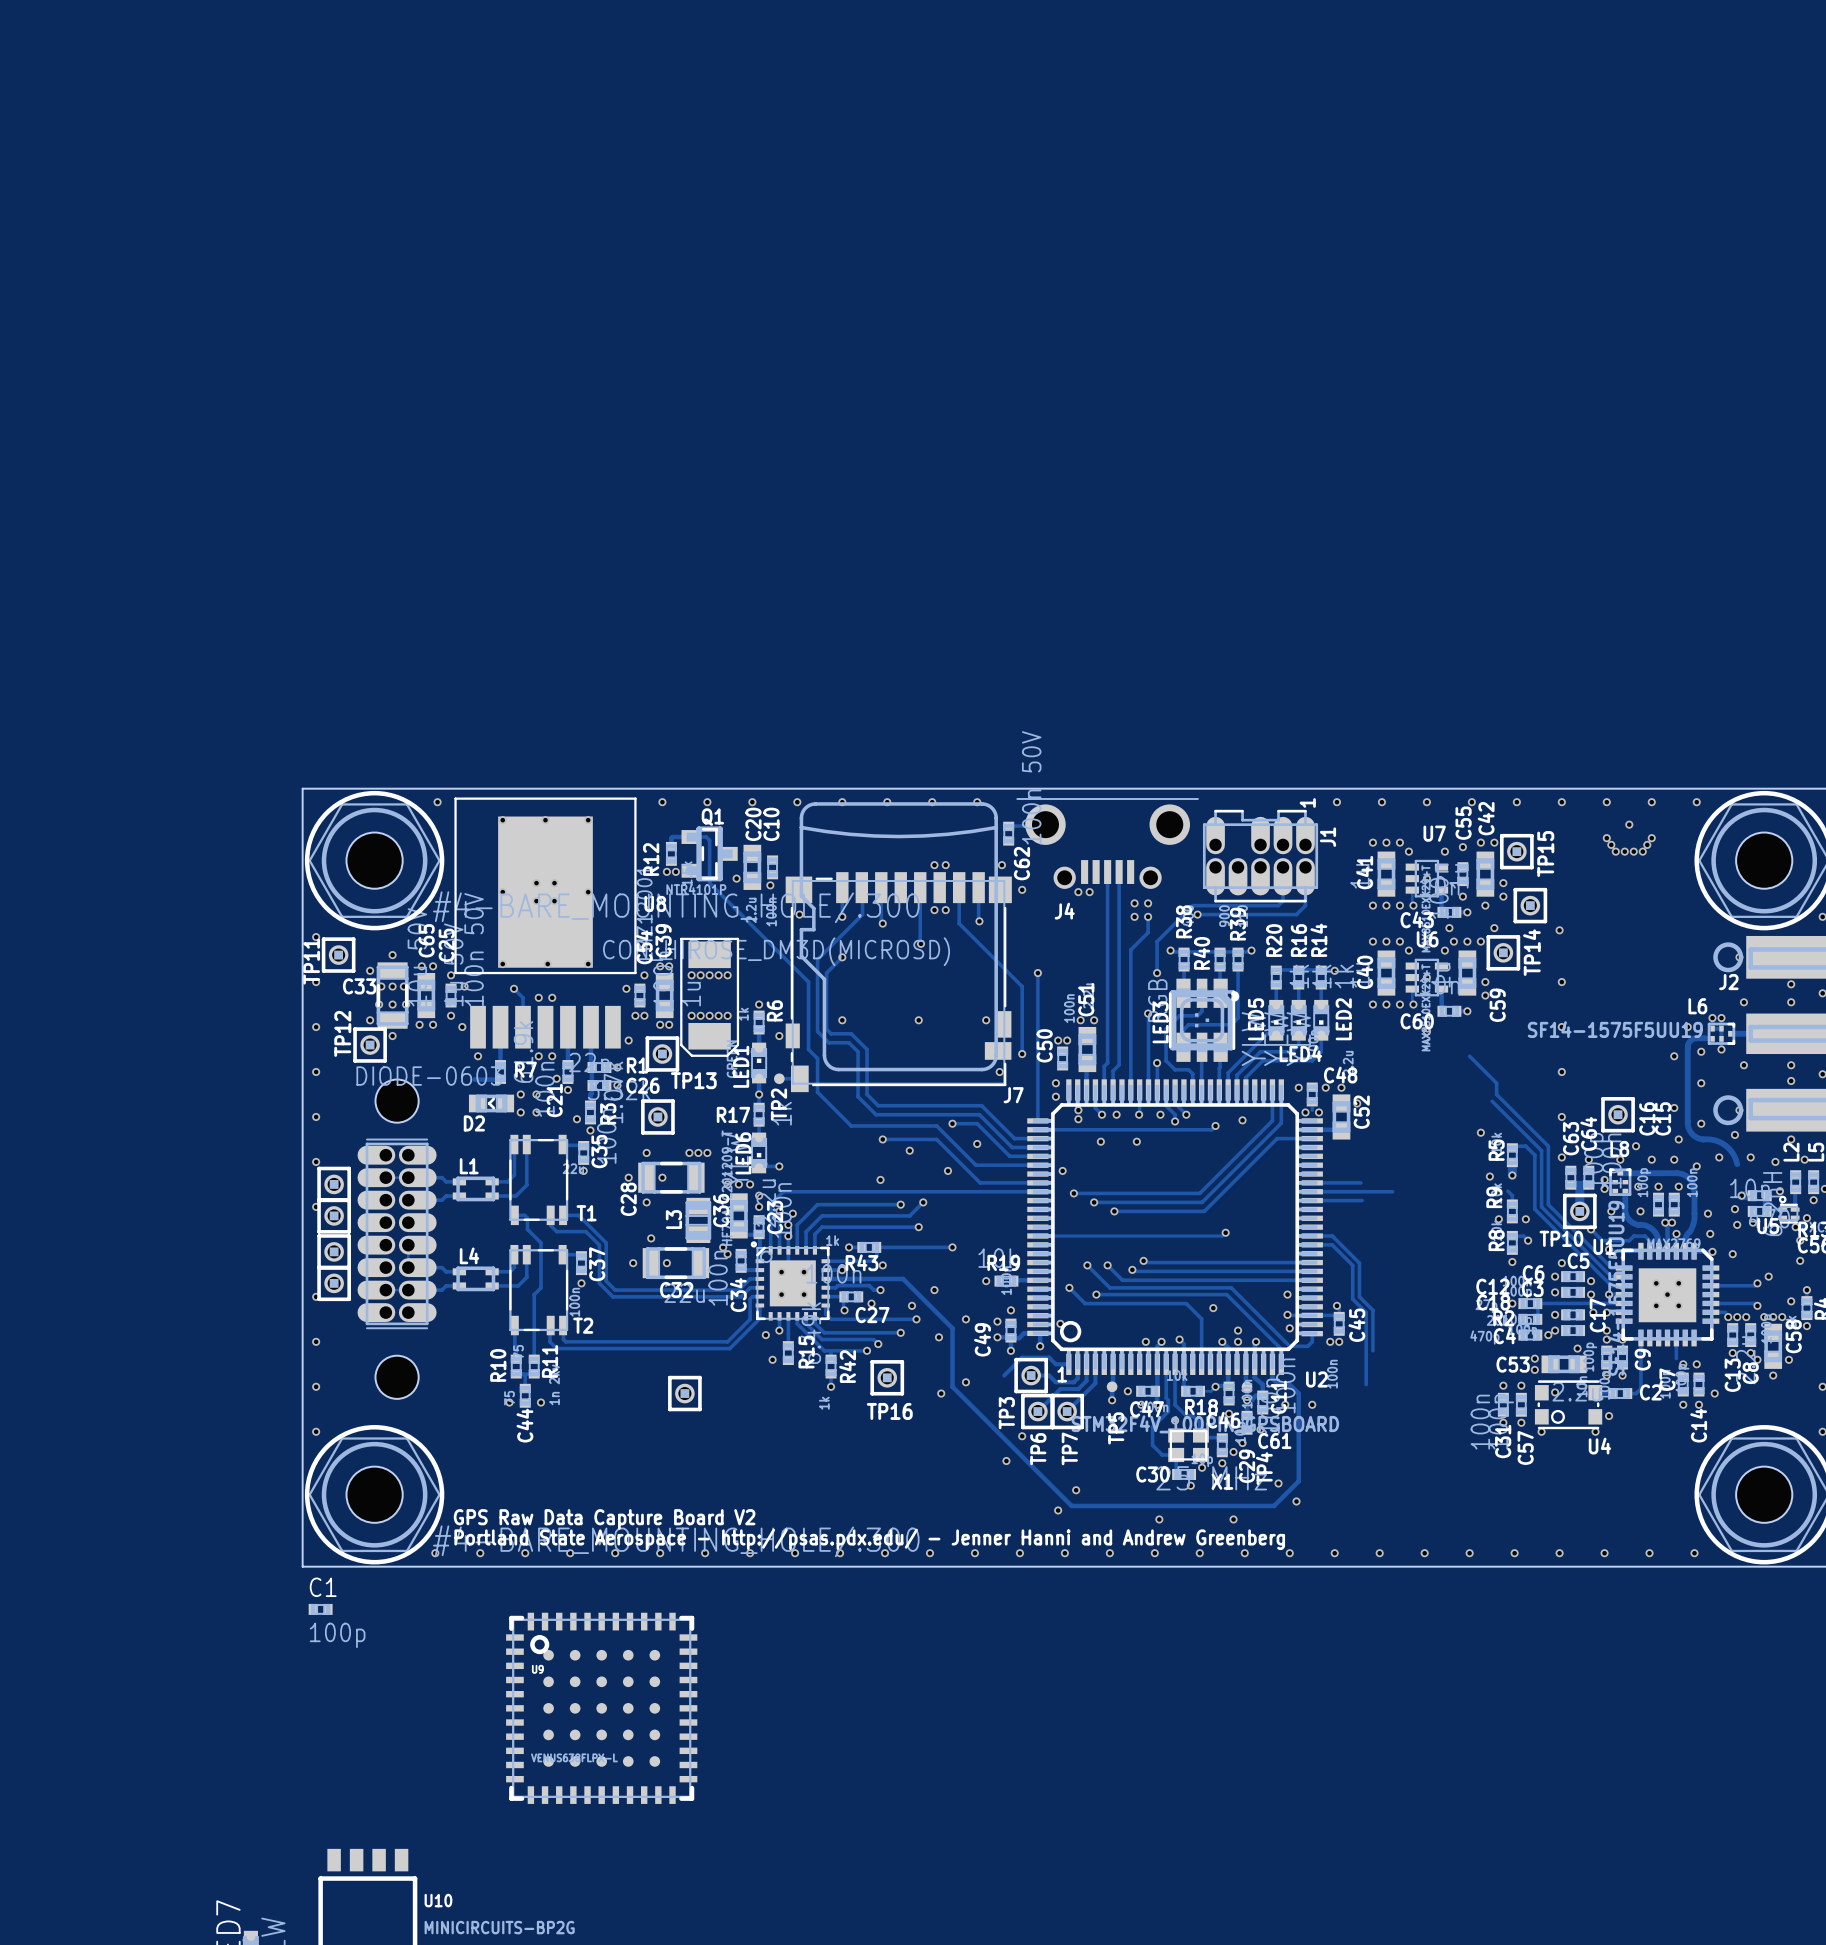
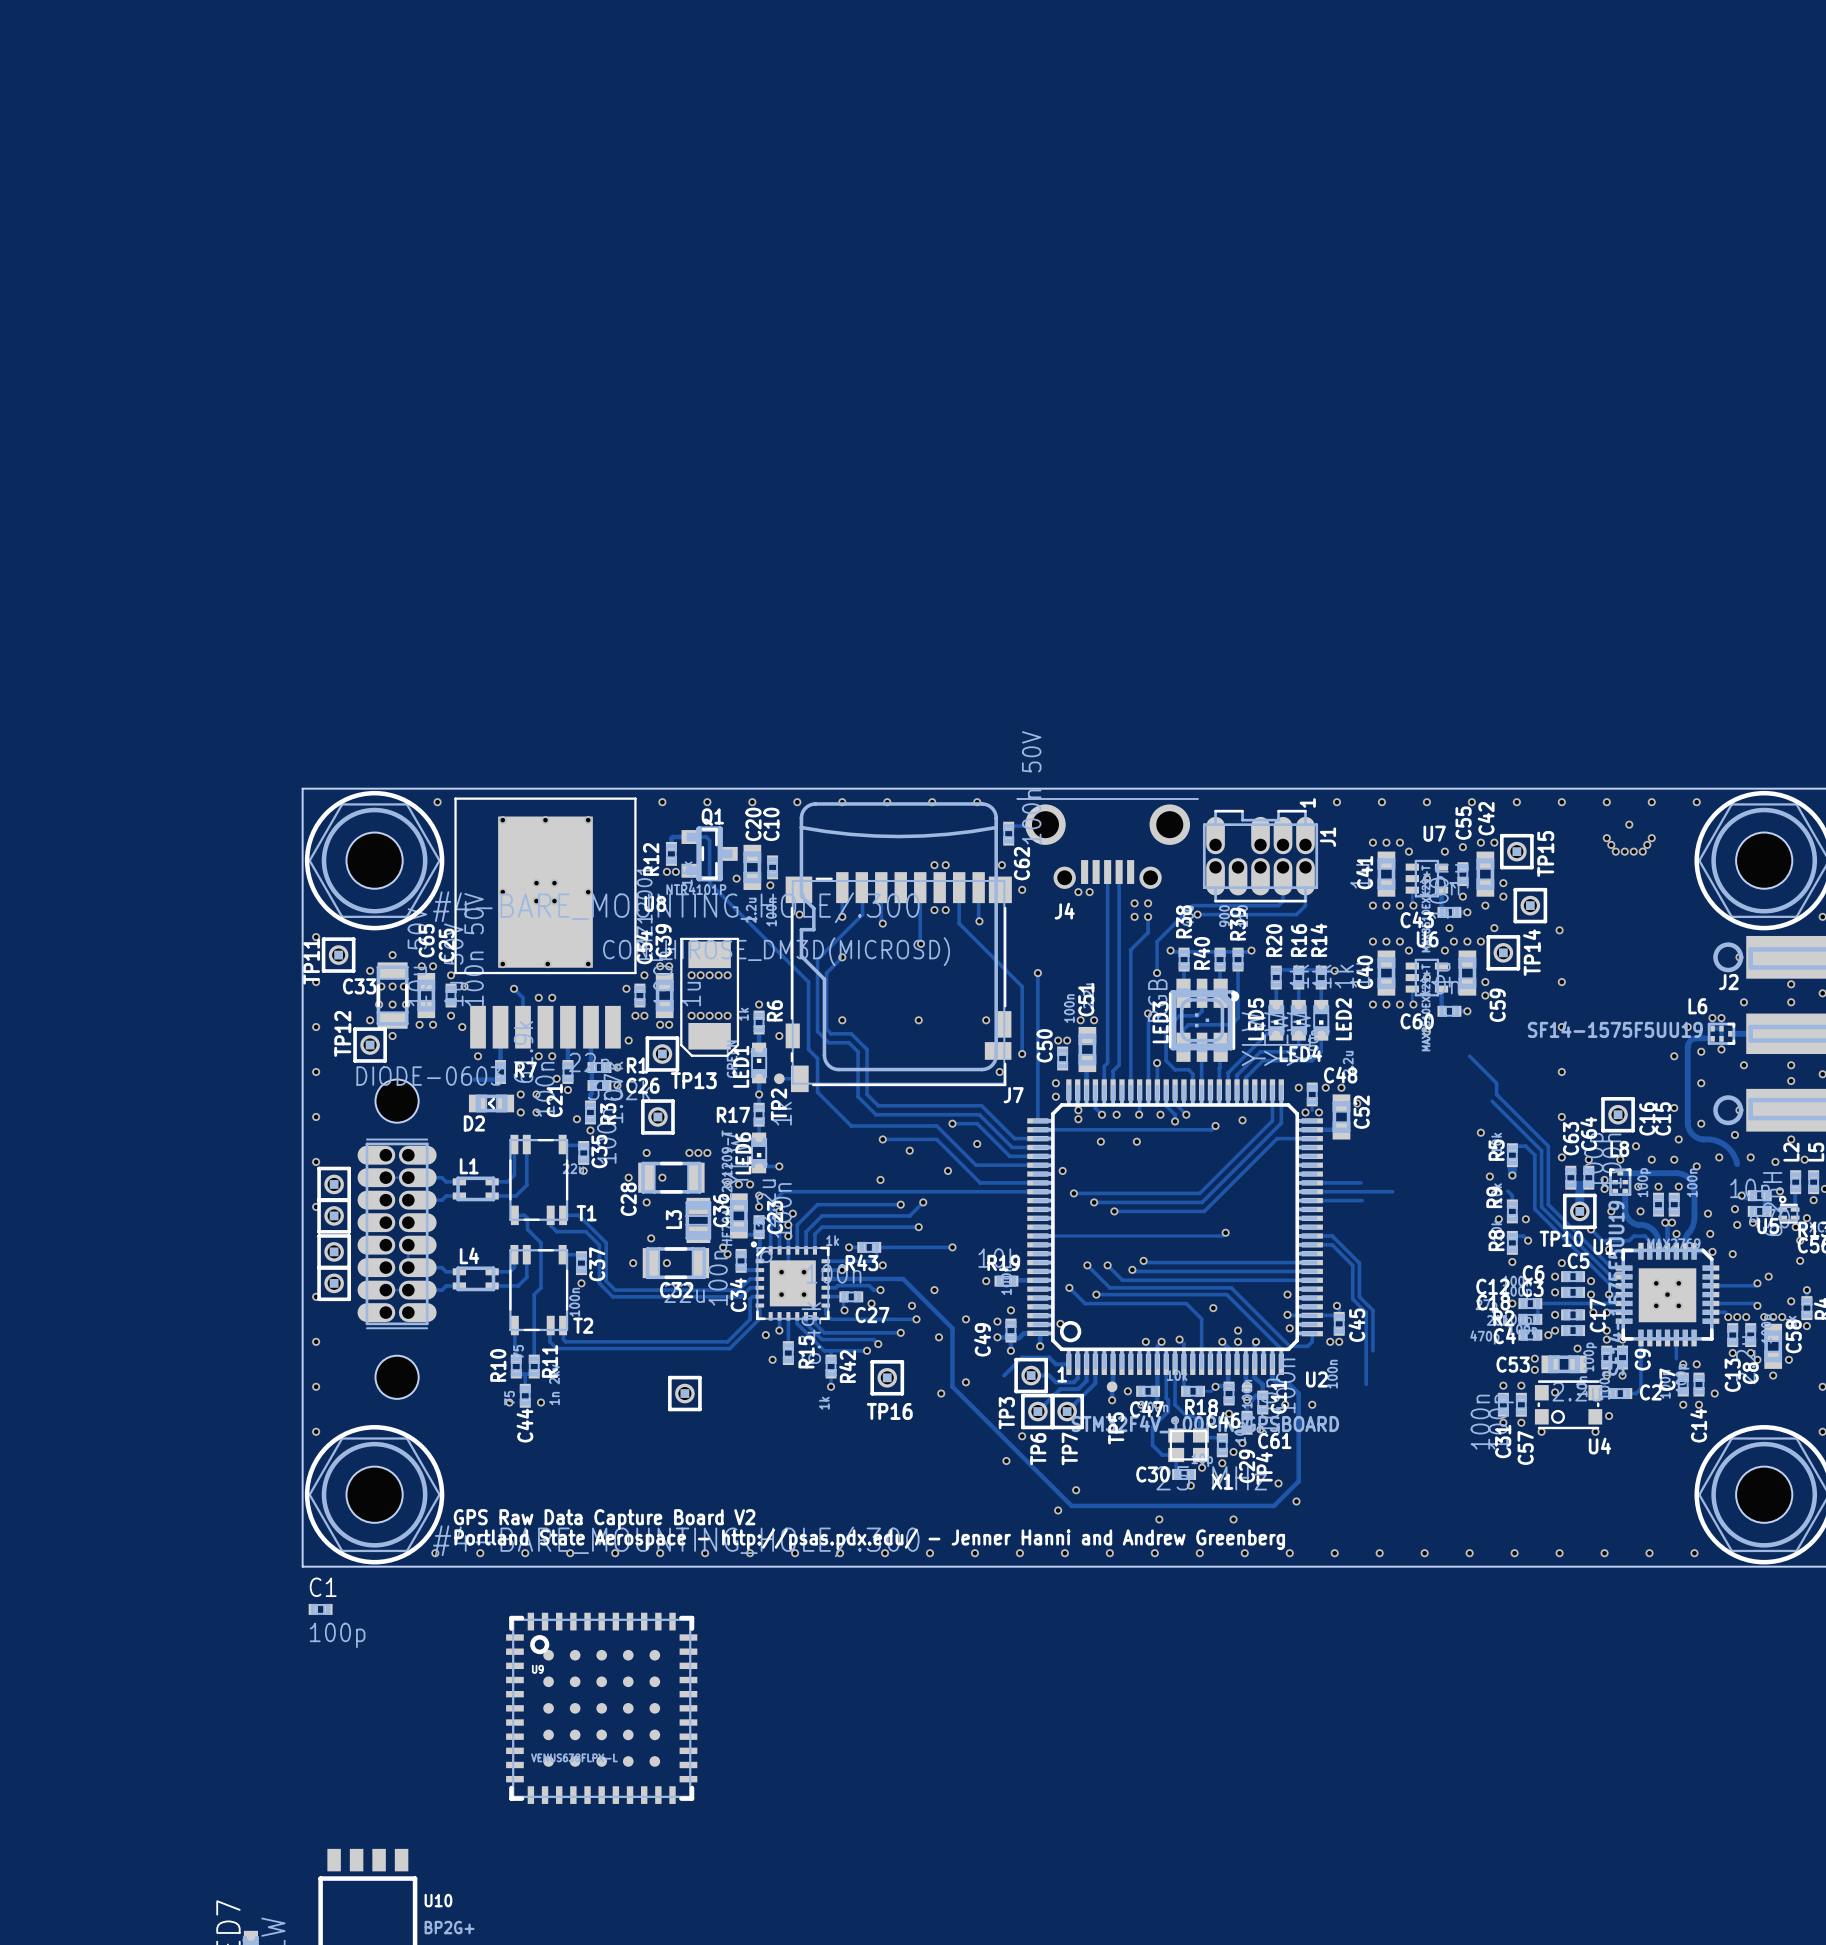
U10 value: MINICIRCUITS-BP2G (499, 1927) -> BP2G+ (449, 1927)

